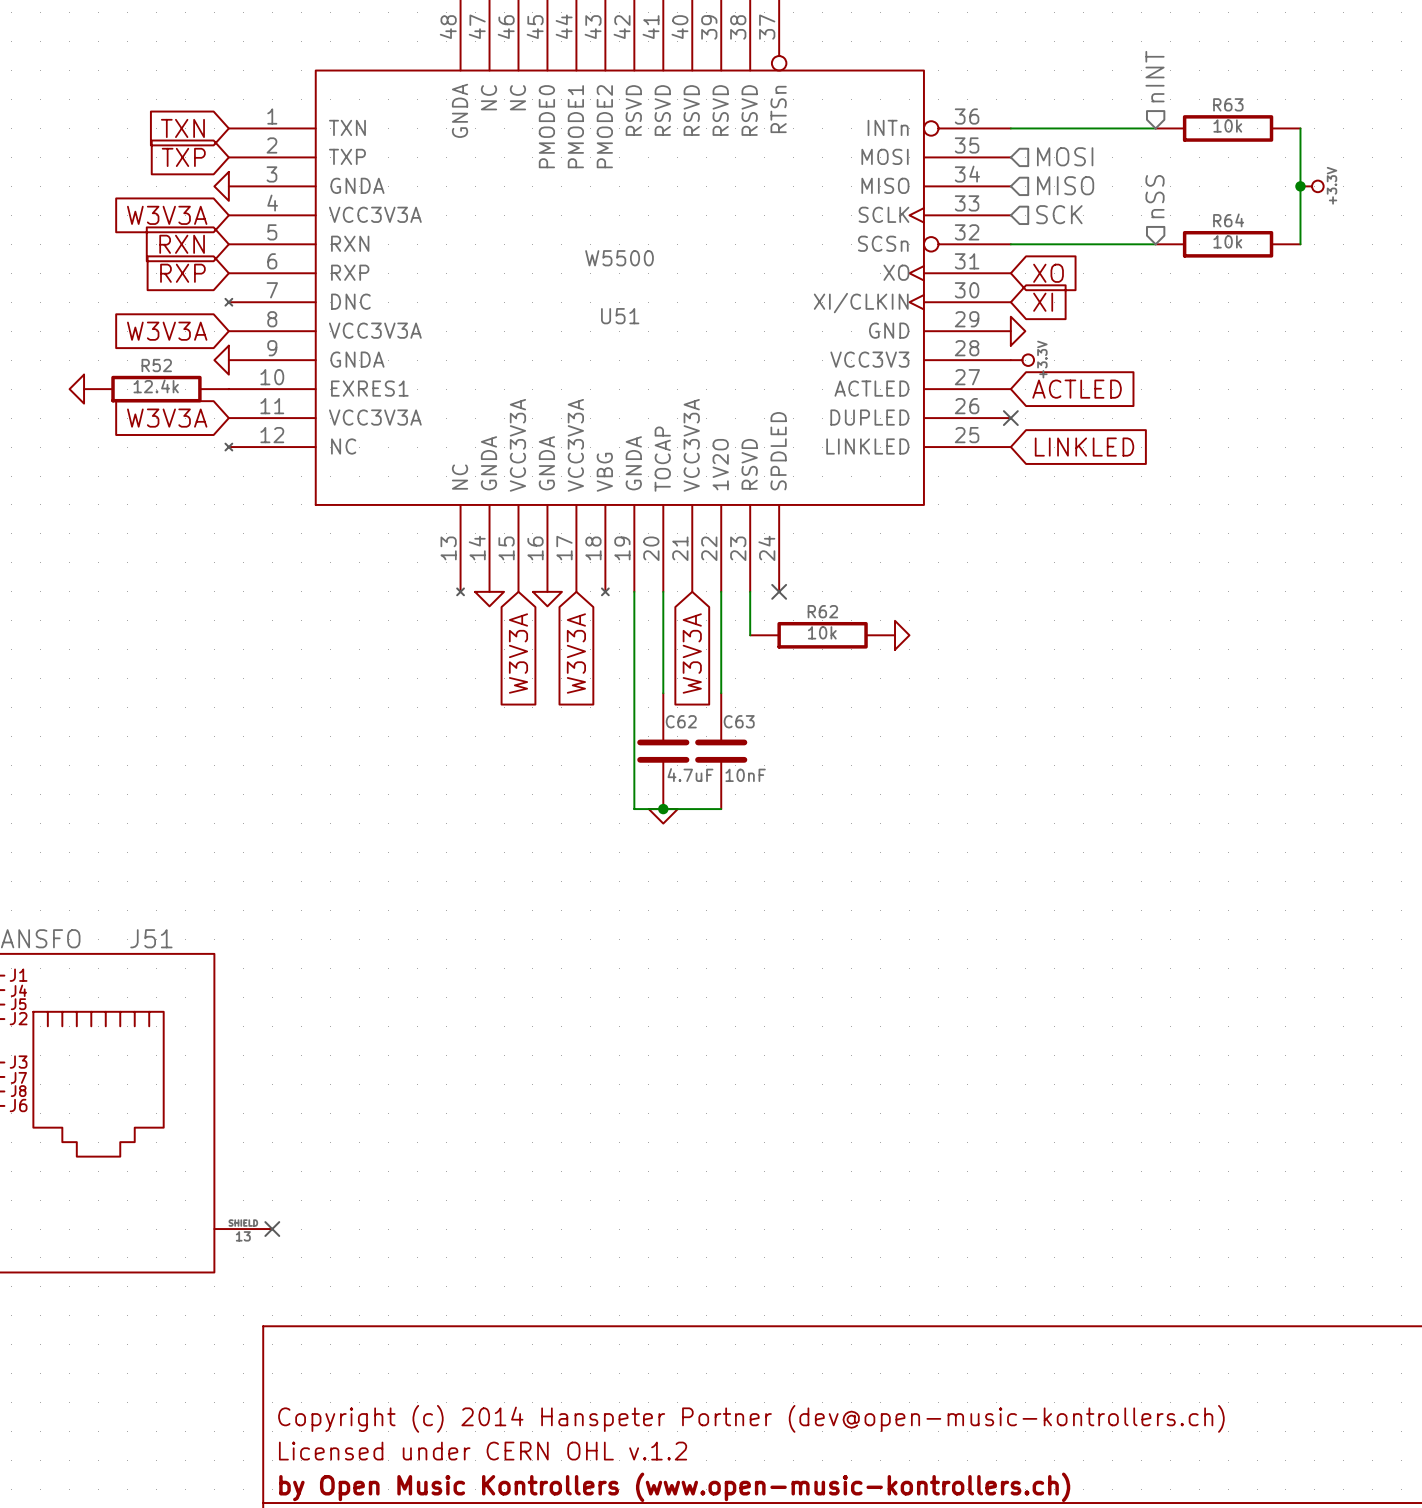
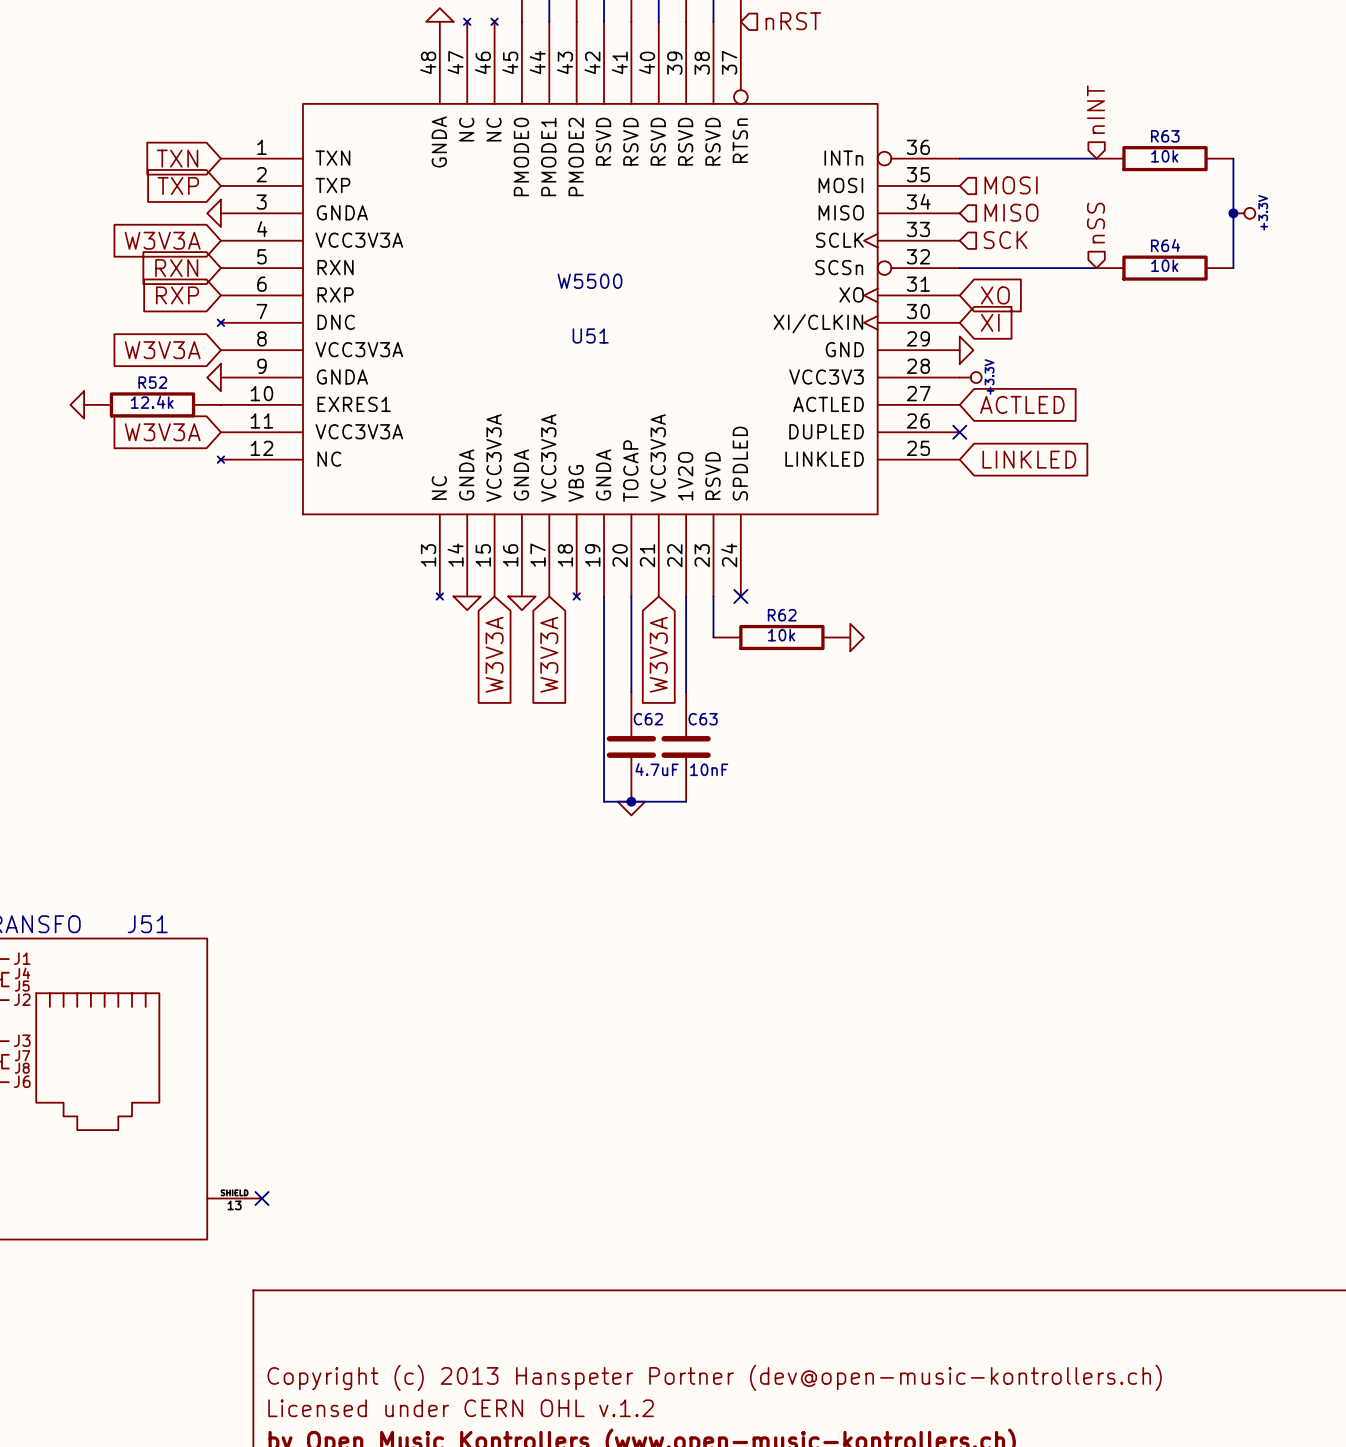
title block: Copyright (c) 2014 Hanspeter Portner (dev@open-music-kontrollers.ch) (751, 1418) -> Copyright (c) 2013 Hanspeter Portner (dev@open-music-kontrollers.ch) (714, 1377)

